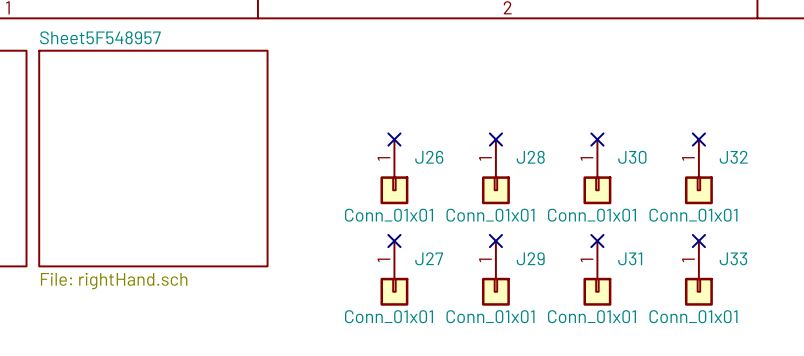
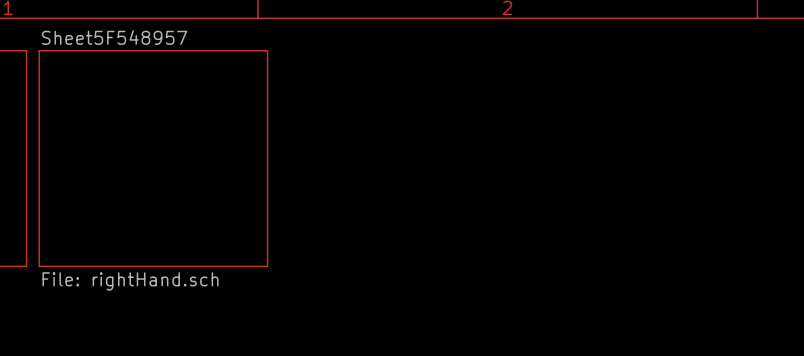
no-connect mark: (394, 139) -> none
no-connect mark: (495, 139) -> none
no-connect mark: (597, 139) -> none
no-connect mark: (698, 139) -> none
J26: Conn_01x01 (394, 171) -> none
J28: Conn_01x01 (495, 171) -> none
J30: Conn_01x01 (597, 171) -> none
J32: Conn_01x01 (698, 171) -> none
no-connect mark: (394, 241) -> none
no-connect mark: (495, 241) -> none
no-connect mark: (597, 241) -> none
no-connect mark: (698, 241) -> none
J27: Conn_01x01 (394, 273) -> none
J29: Conn_01x01 (495, 273) -> none
J31: Conn_01x01 (597, 273) -> none
J33: Conn_01x01 (698, 273) -> none

